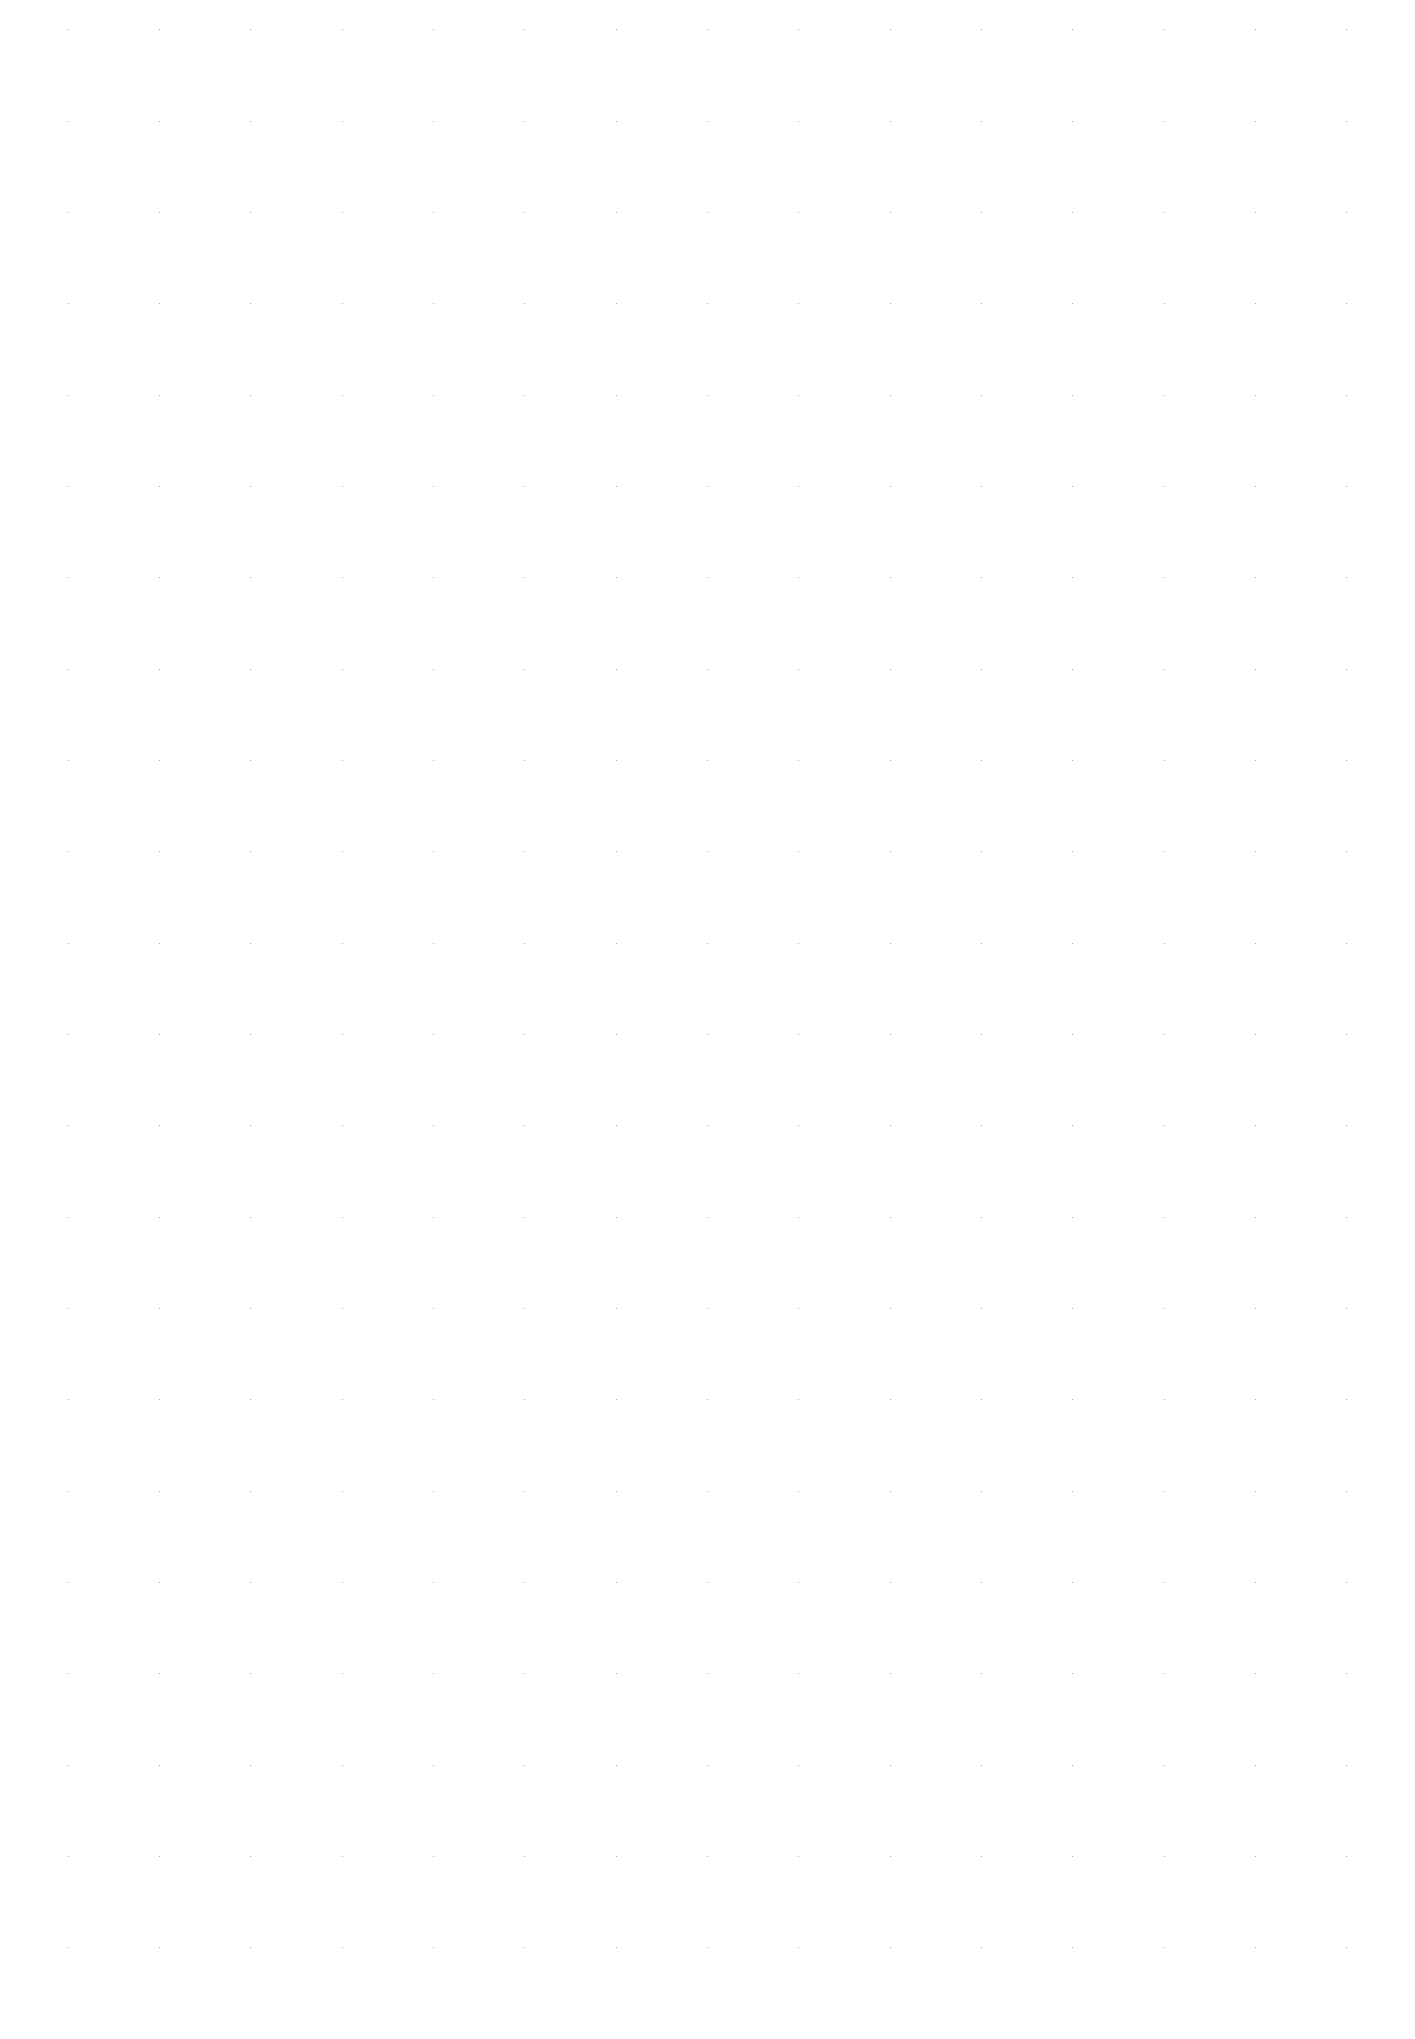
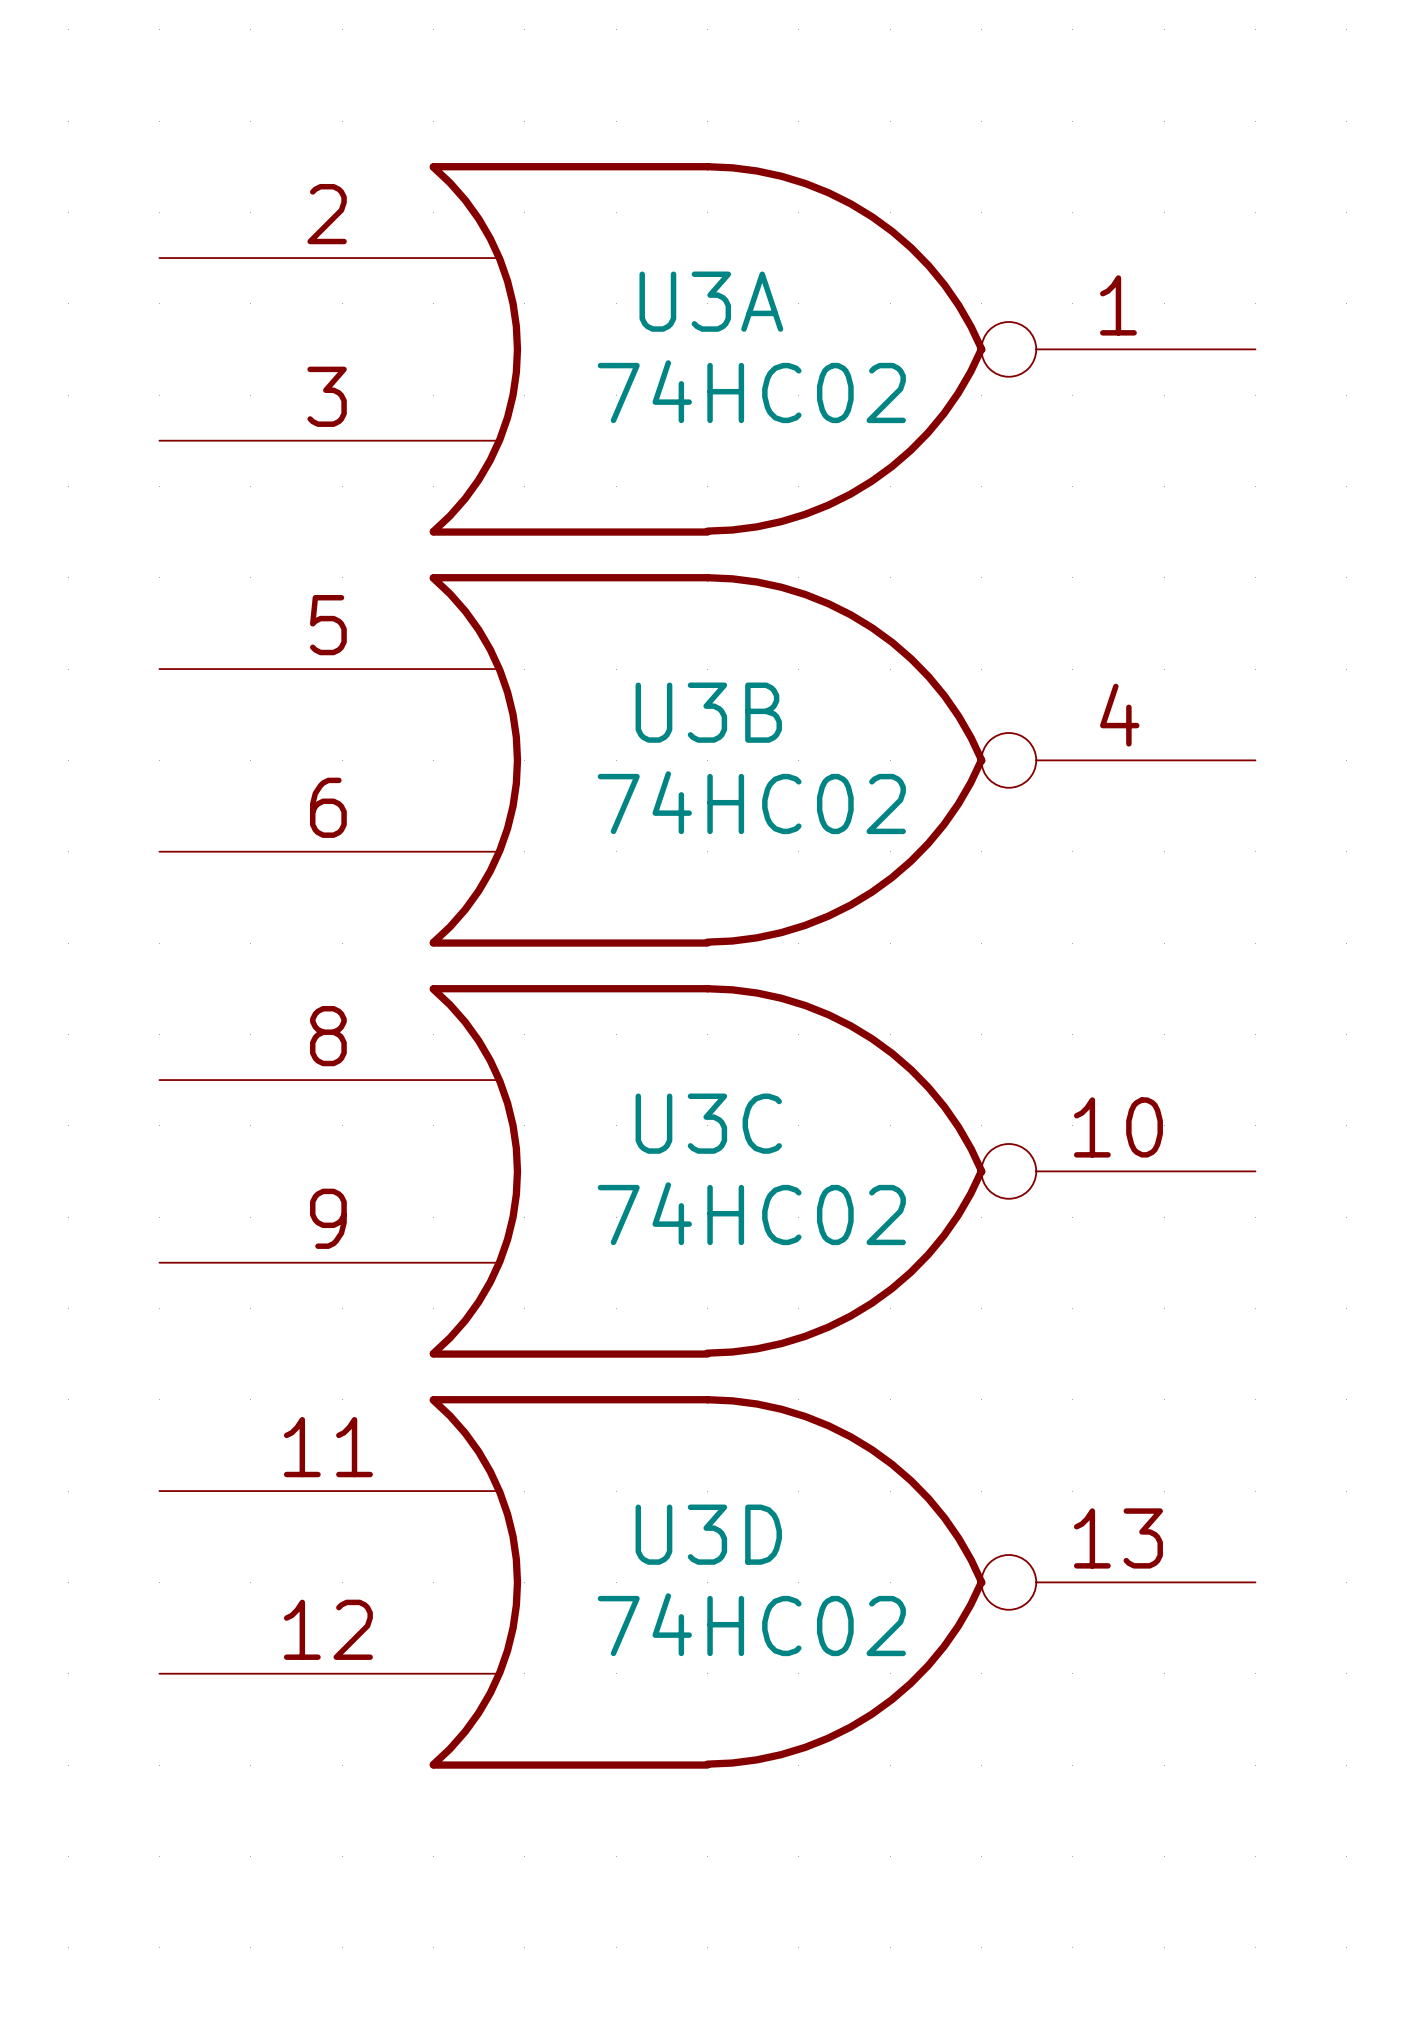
U3A: none -> 74HC02 (707, 349)
U3B: none -> 74HC02 (707, 760)
U3C: none -> 74HC02 (707, 1171)
U3D: none -> 74HC02 (707, 1582)

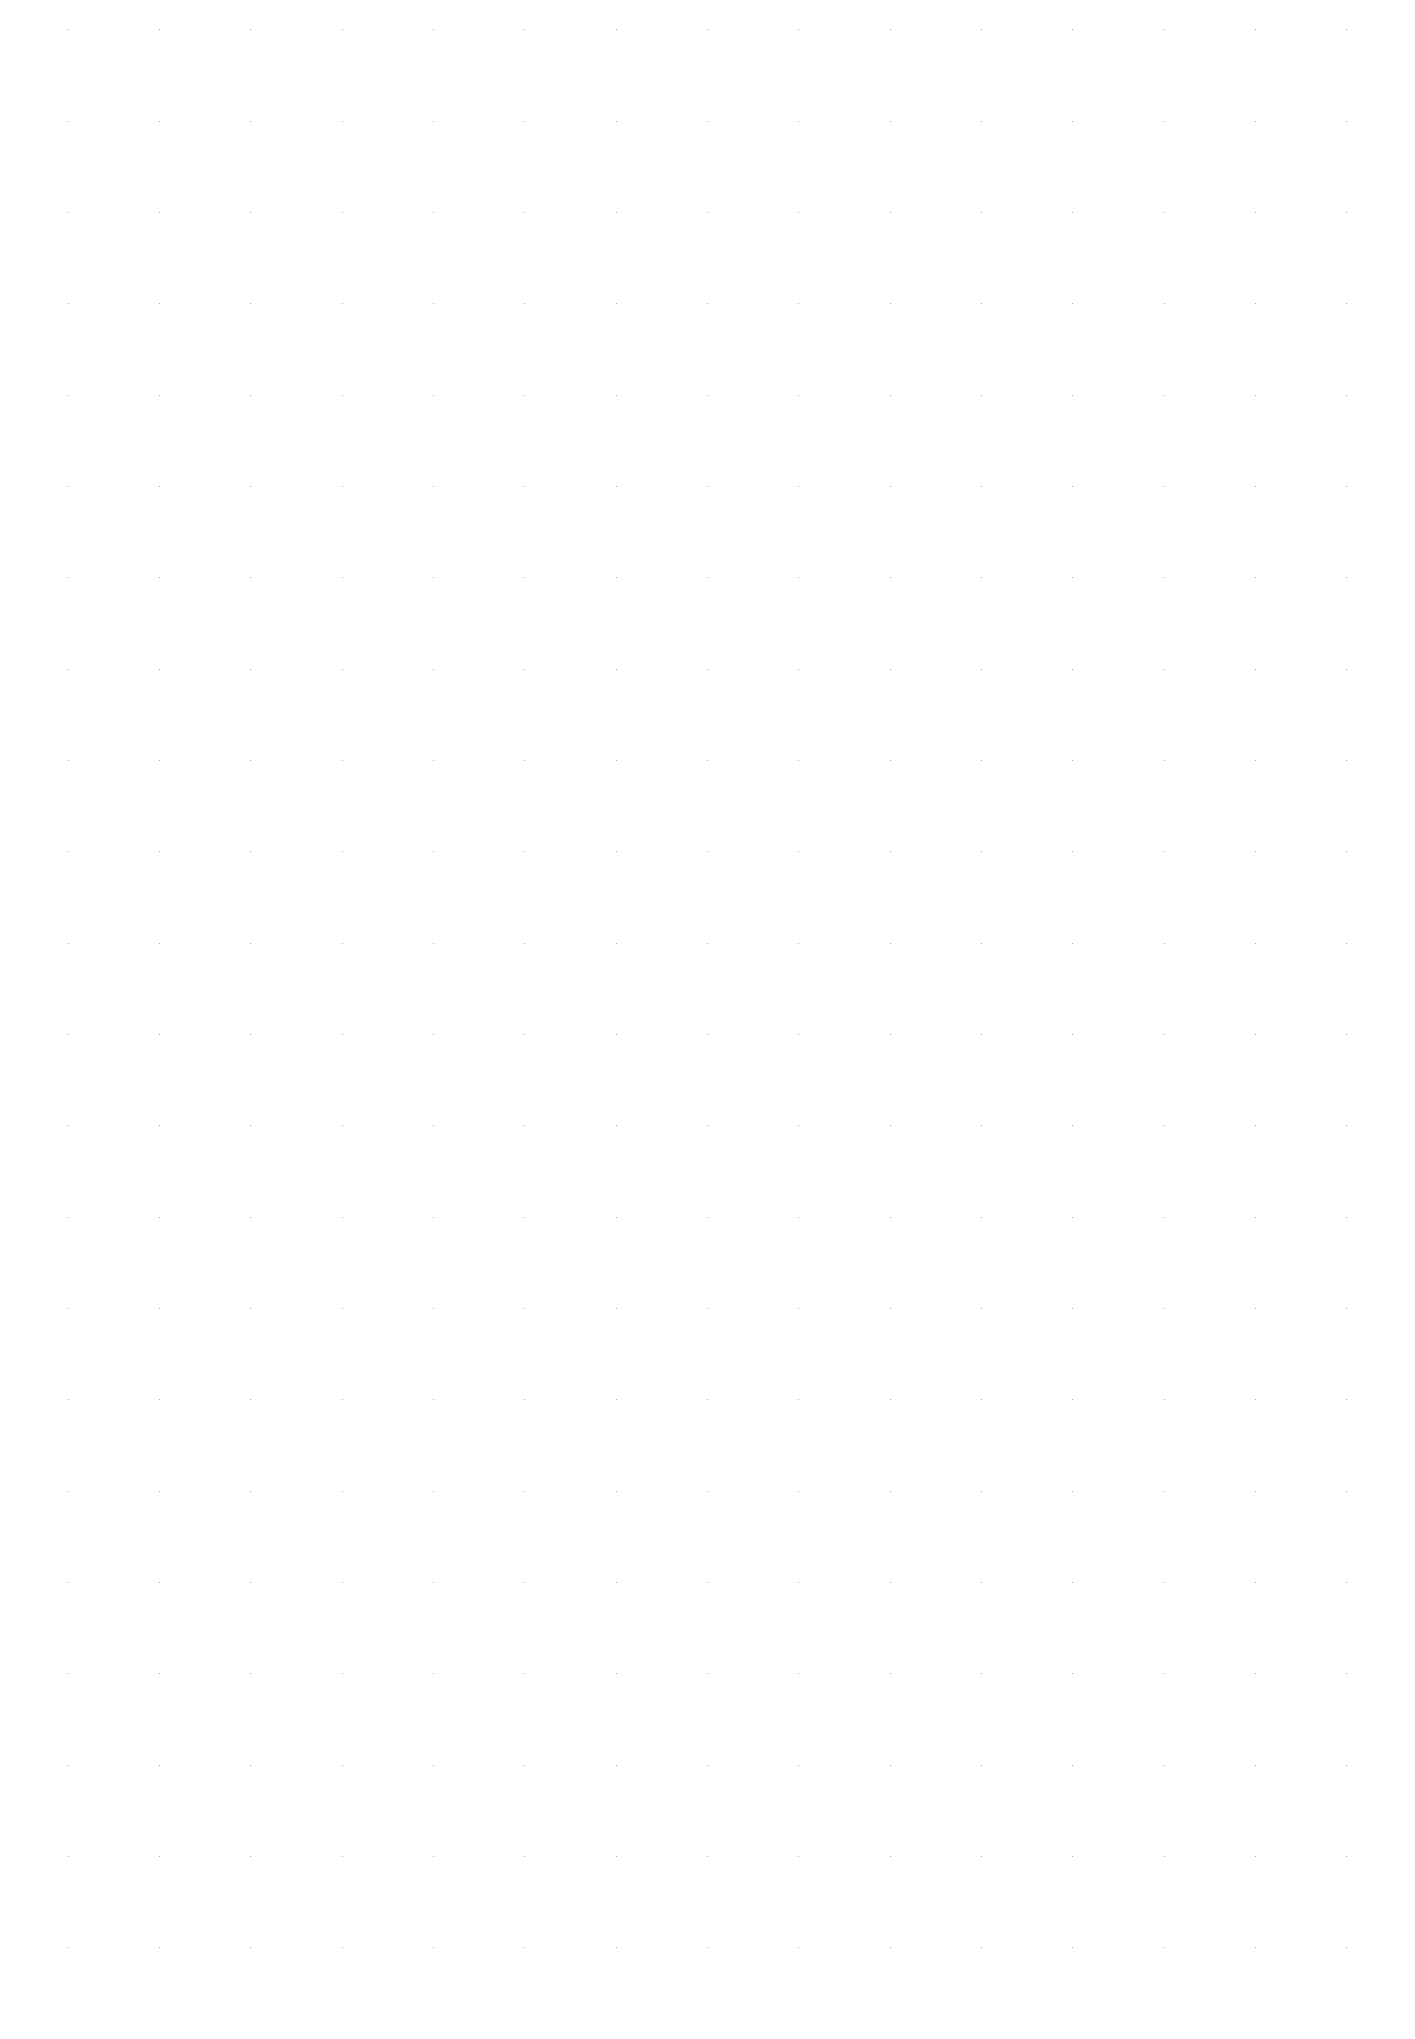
U3A: 74HC02 (707, 349) -> none
U3B: 74HC02 (707, 760) -> none
U3C: 74HC02 (707, 1171) -> none
U3D: 74HC02 (707, 1582) -> none

